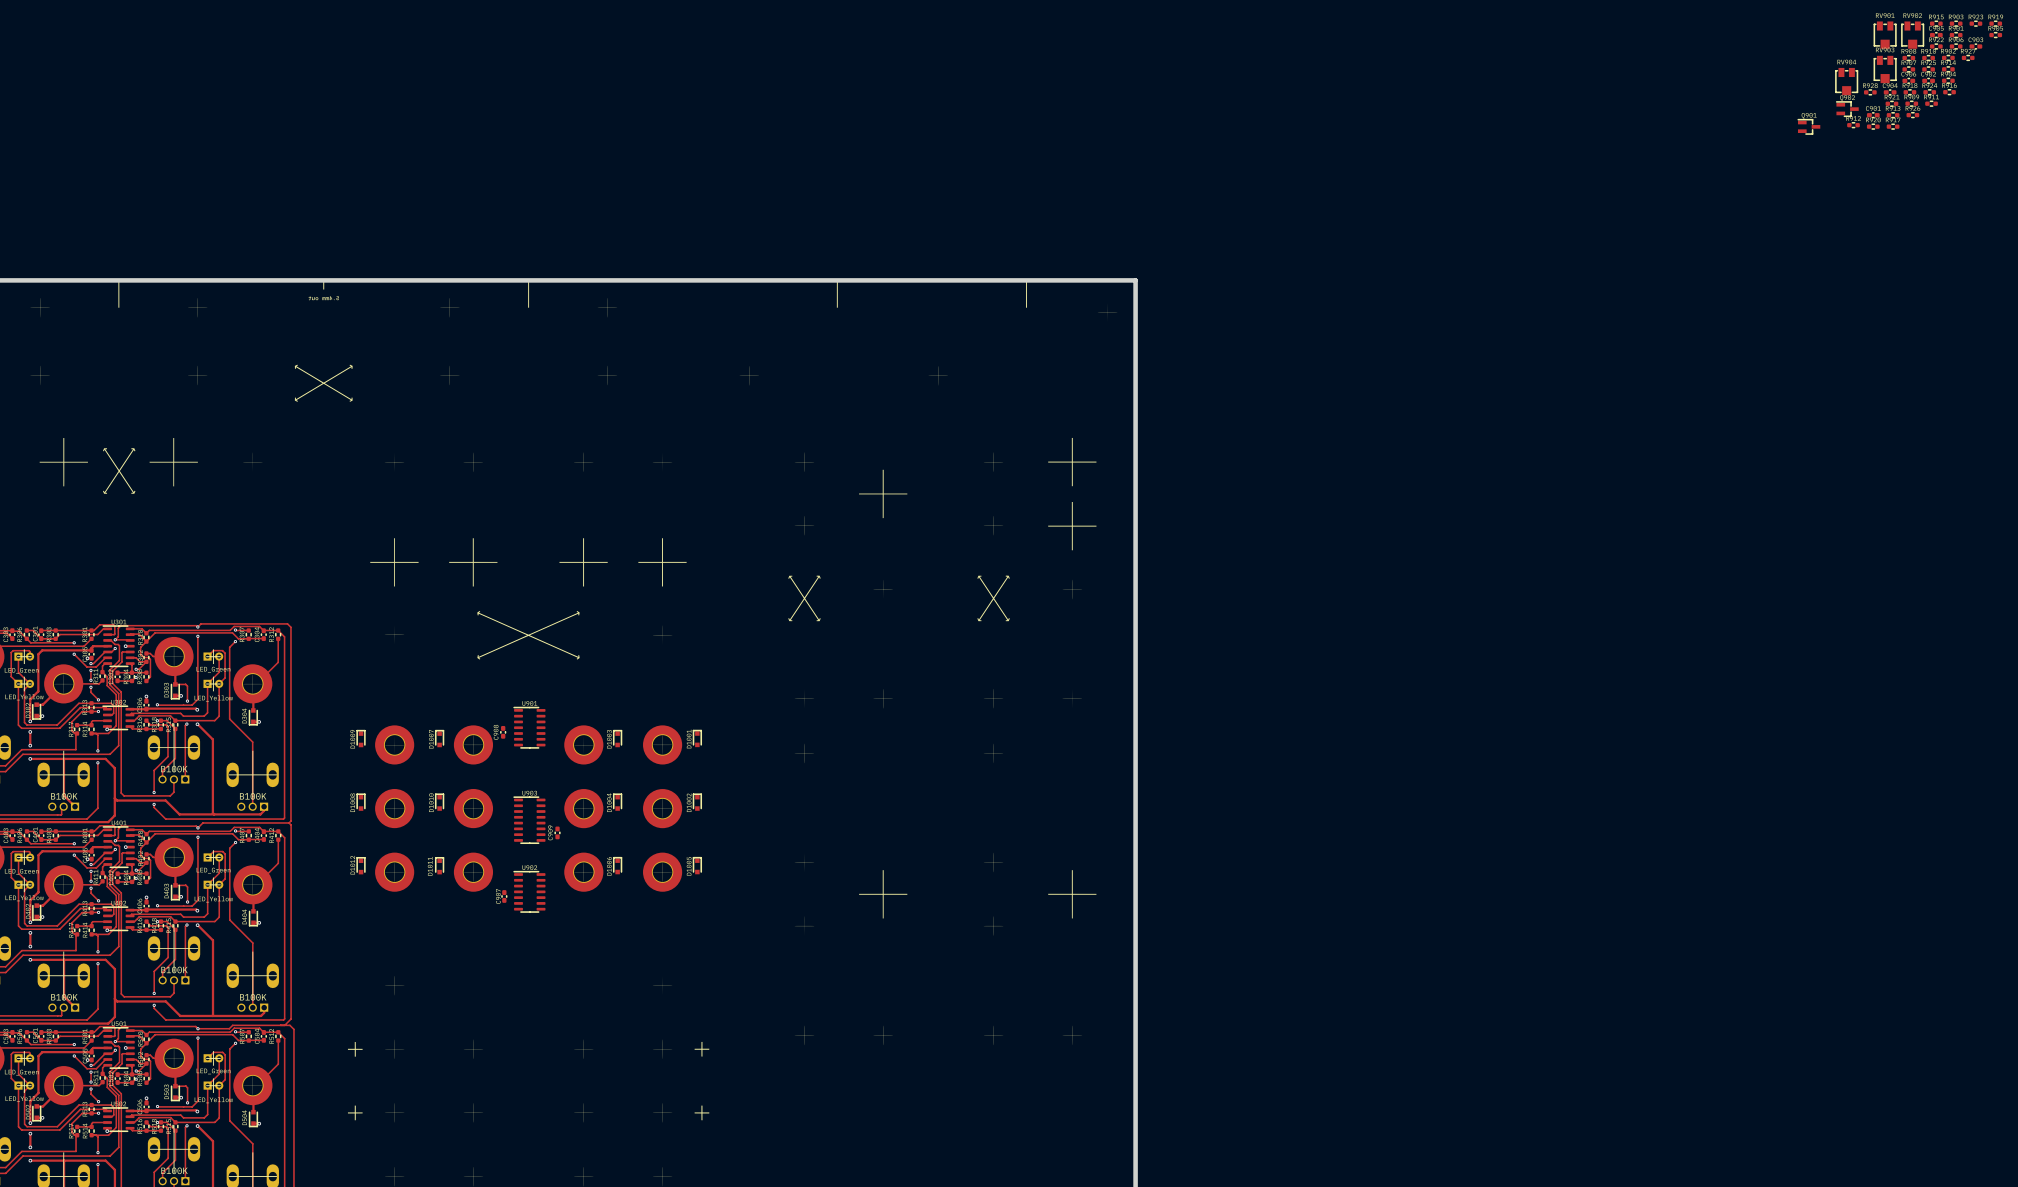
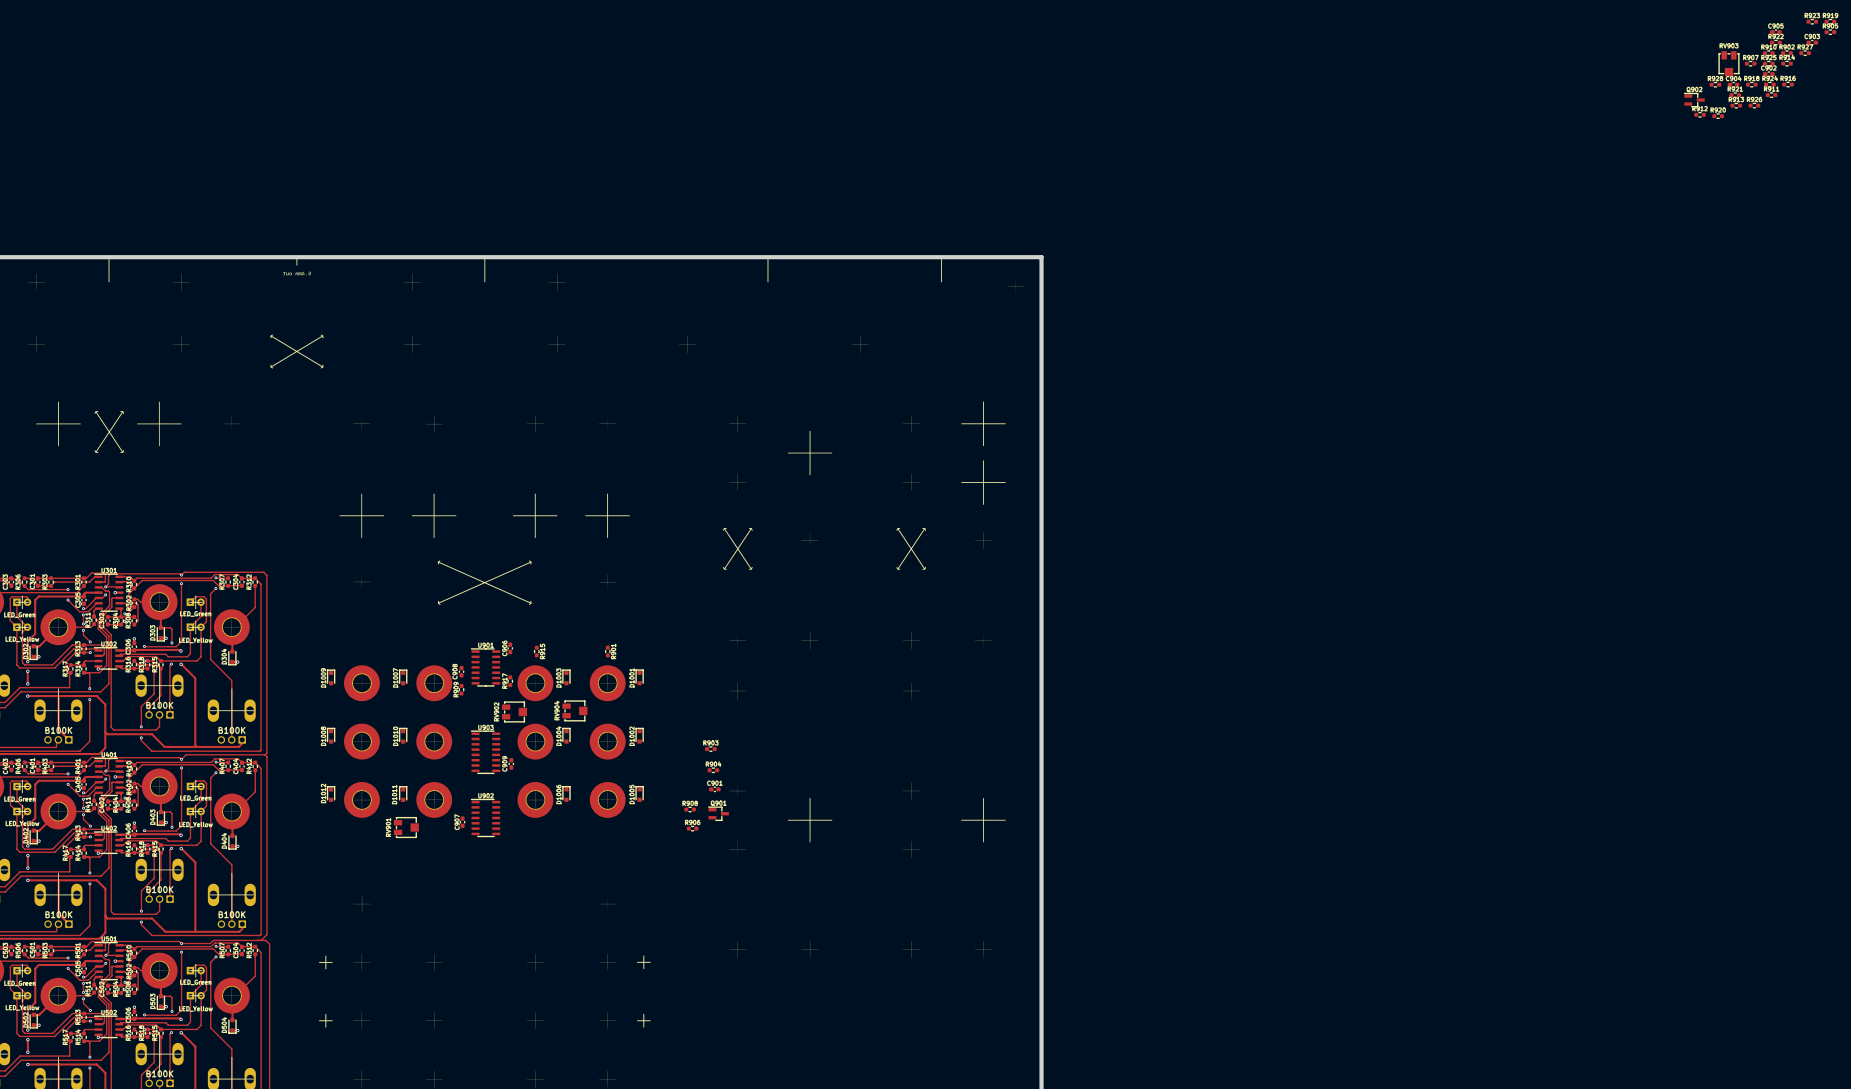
part rotation: 0° (1936, 23) -> 90° clockwise (536, 651)
part position: (1936, 23) -> (536, 651)
part position: (1956, 23) -> (710, 749)
part rotation: 0° (1885, 35) -> 90° counterclockwise (406, 827)
part position: (1885, 35) -> (406, 827)
part rotation: 0° (1912, 35) -> 90° counterclockwise (514, 711)
part position: (1912, 35) -> (514, 711)
part rotation: 0° (1956, 35) -> 90° clockwise (607, 651)
part position: (1956, 35) -> (607, 651)
part position: (1956, 46) -> (692, 828)
part position: (1908, 58) -> (690, 809)
part rotation: 0° (1908, 80) -> 90° clockwise (510, 648)
part position: (1908, 80) -> (510, 648)
part position: (1948, 80) -> (713, 770)
part rotation: 0° (1846, 81) -> 90° counterclockwise (574, 710)
part position: (1846, 81) -> (574, 710)
part rotation: 0° (1911, 103) -> 90° clockwise (461, 689)
part position: (1911, 103) -> (461, 689)
part position: (1873, 115) -> (714, 789)
part position: (1809, 126) -> (718, 813)
part rotation: 0° (1893, 126) -> 90° clockwise (510, 681)
part position: (1893, 126) -> (510, 681)

